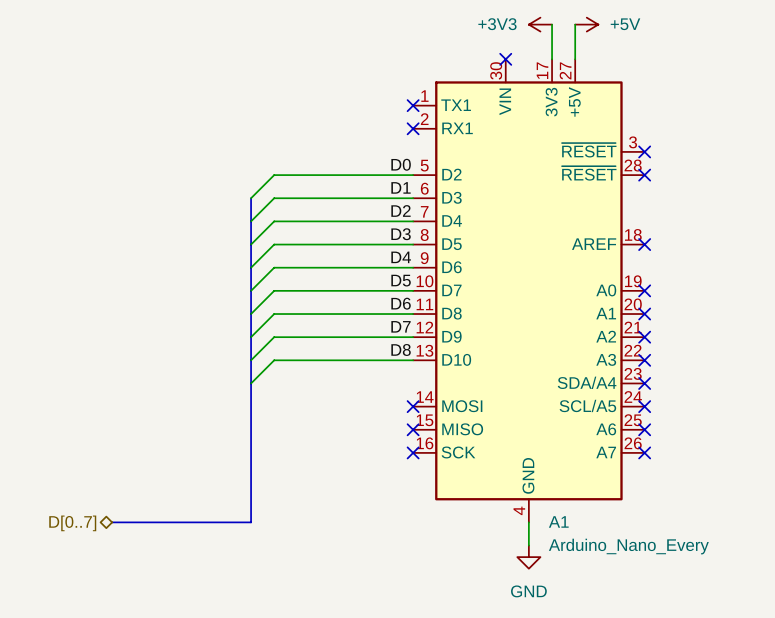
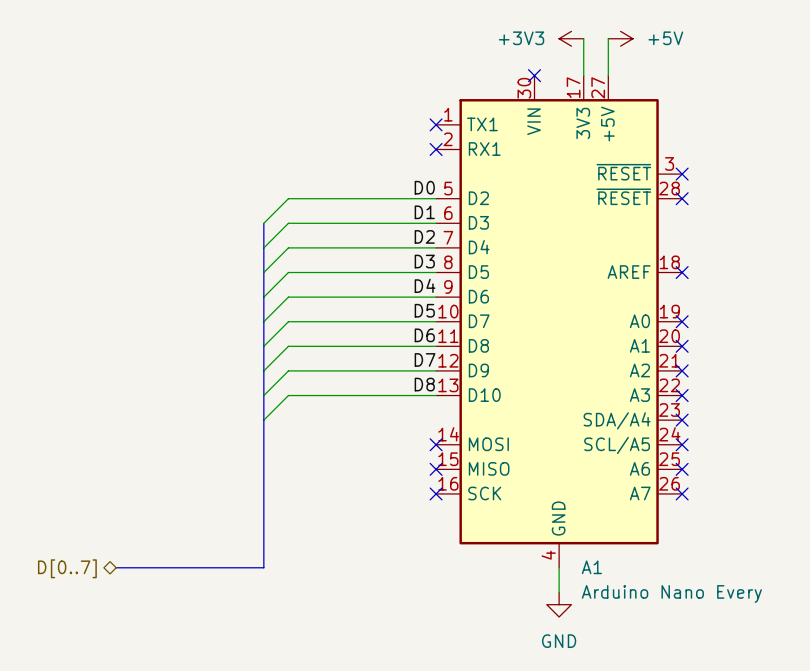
A1 value: Arduino_Nano_Every (628, 546) -> Arduino Nano Every (671, 593)

